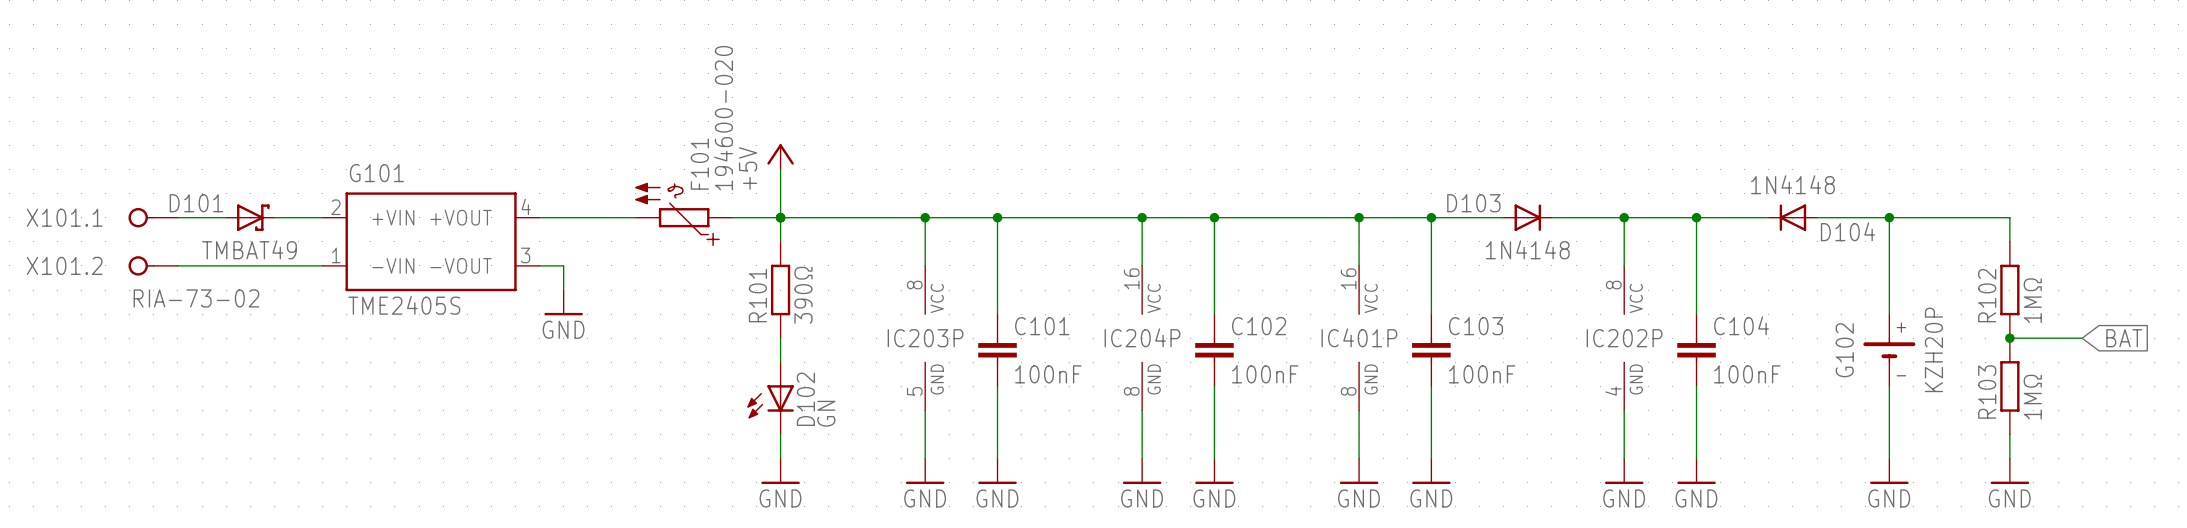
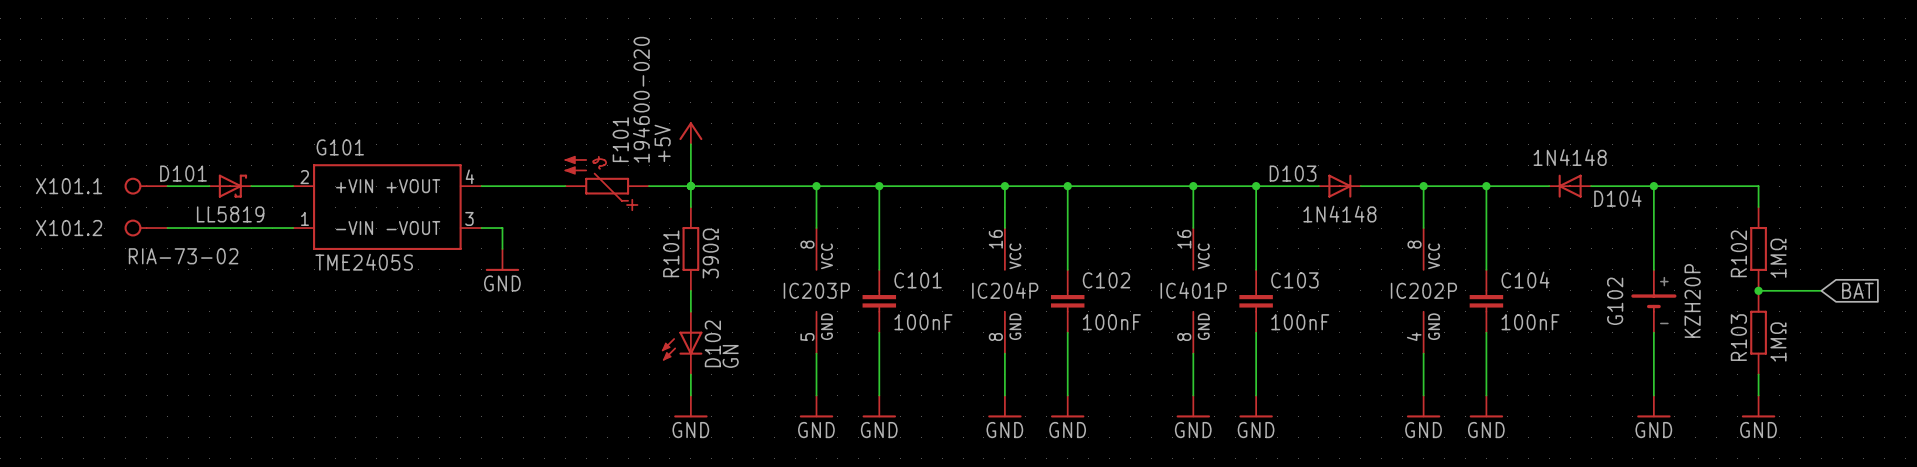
D101 value: TMBAT49 (249, 249) -> LL5819 (230, 214)

